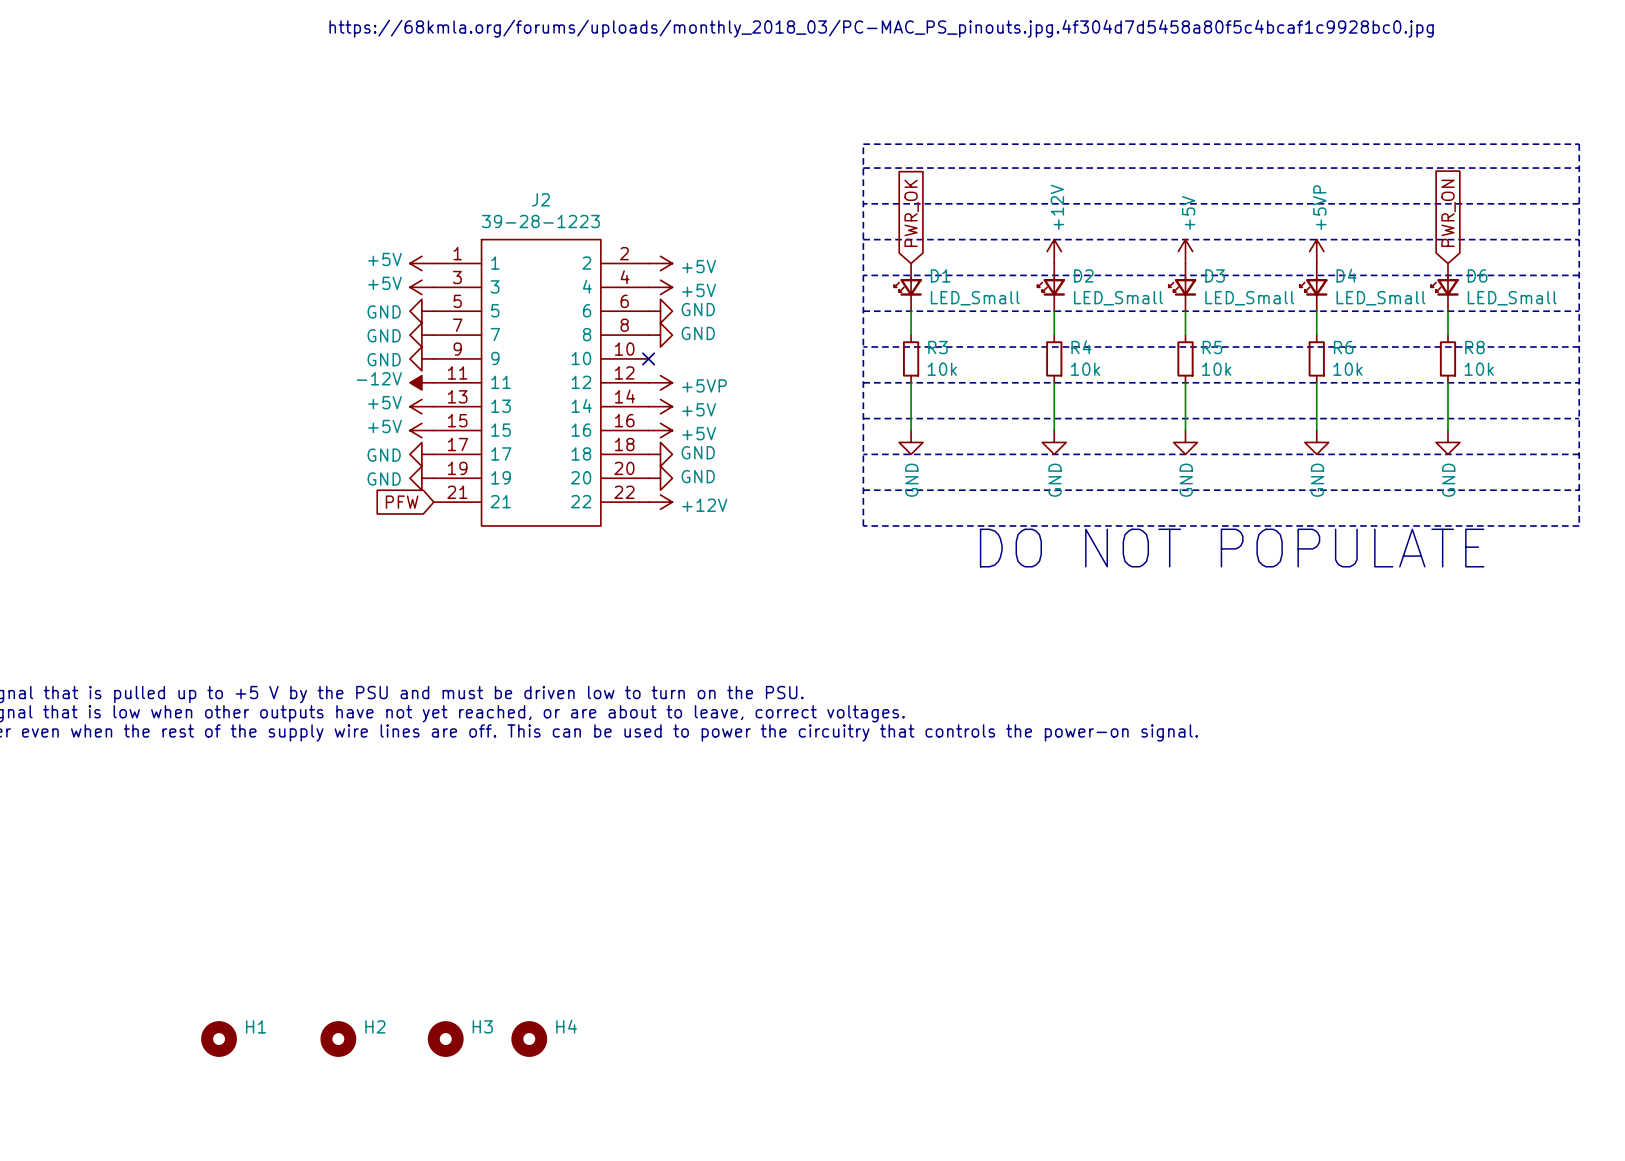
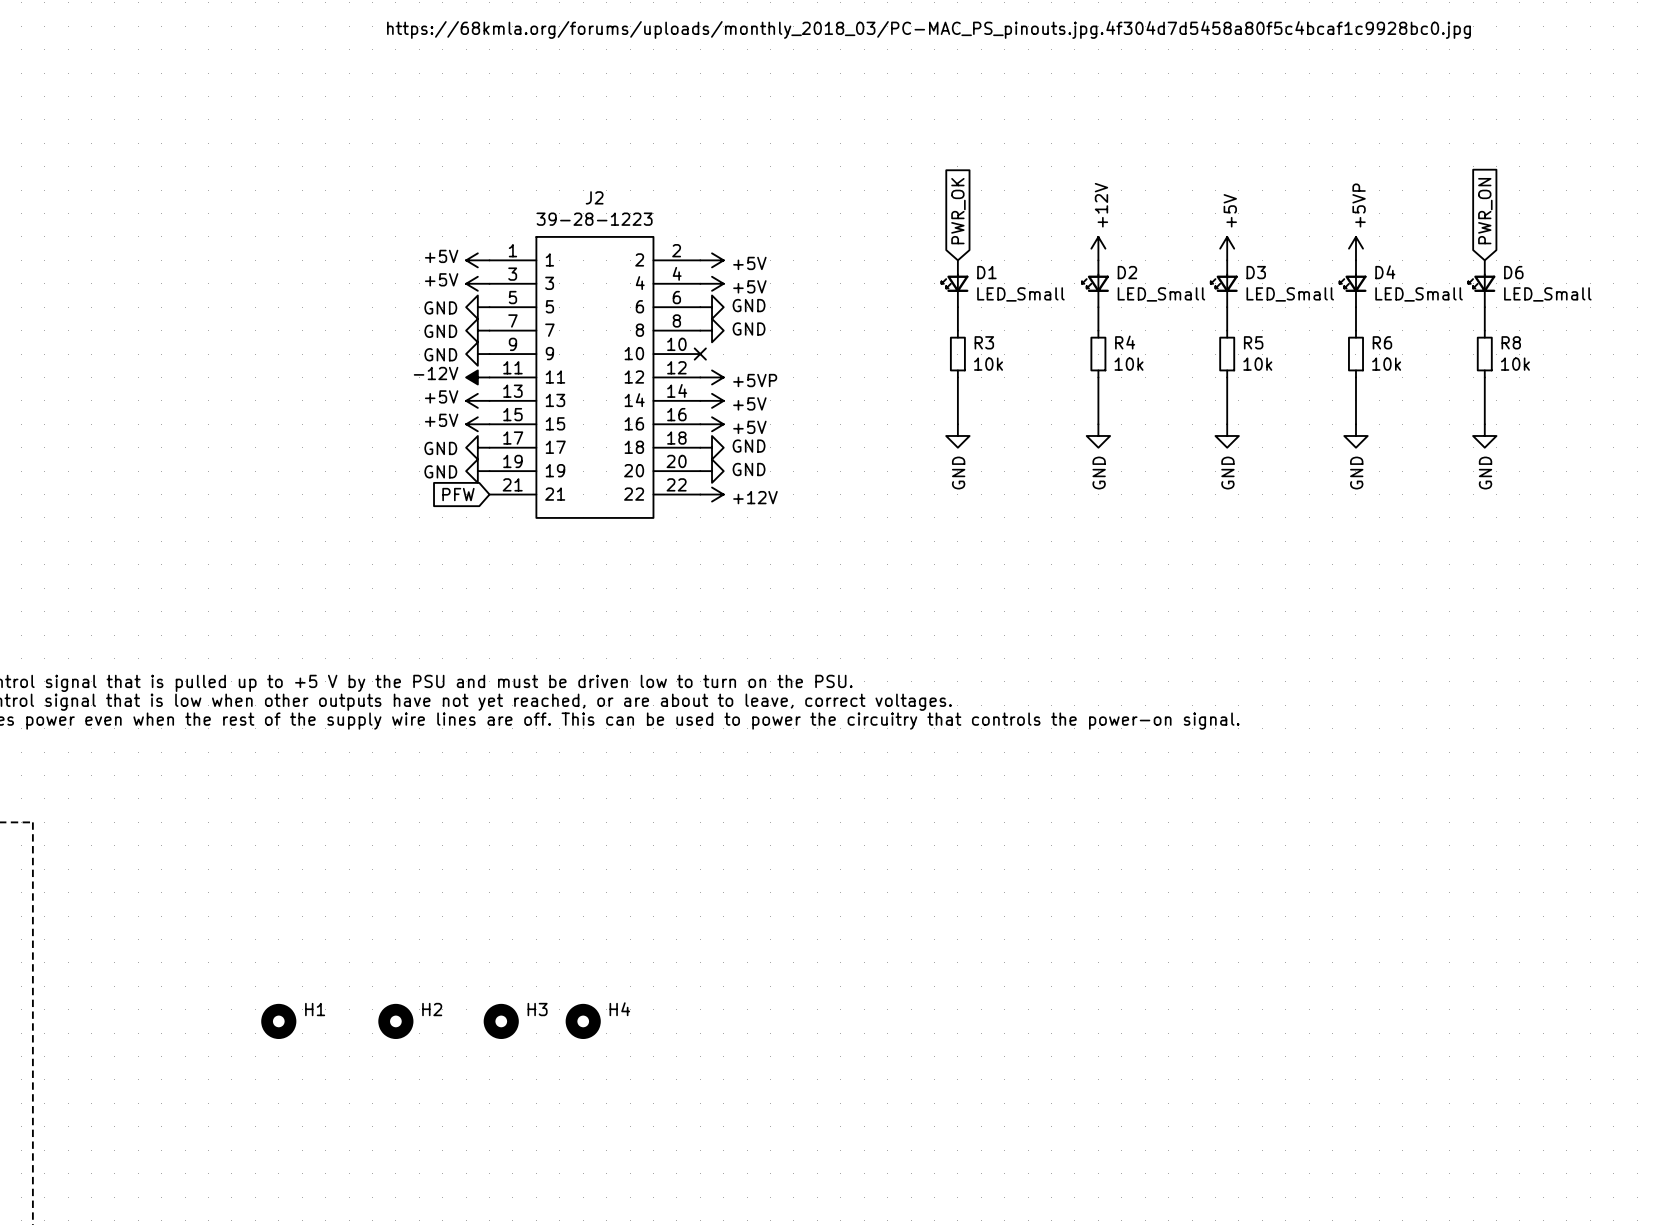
line: (863, 144) (1579, 144) (1579, 525) (863, 525) (863, 144) -> none
line: (863, 168) (1579, 168) -> none
line: (863, 203) (1579, 203) -> none
line: (863, 239) (1579, 239) -> none
line: (863, 275) (1579, 275) -> none
line: (863, 311) (1579, 311) -> none
line: (863, 347) (1579, 347) -> none
line: (863, 382) (1579, 382) -> none
line: (863, 418) (1579, 418) -> none
line: (863, 454) (1579, 454) -> none
line: (863, 490) (1579, 490) -> none
text: DO NOT POPULATE (1232, 548) -> none

